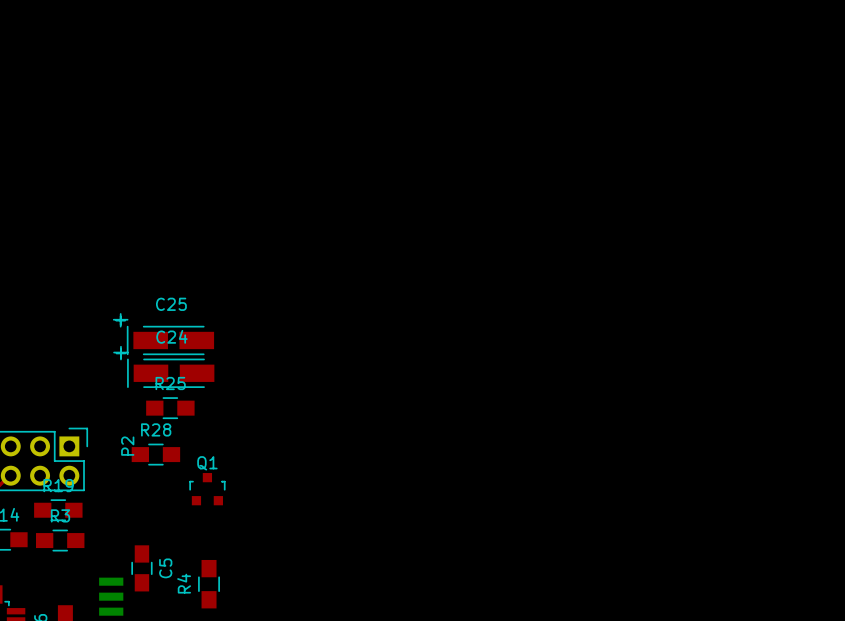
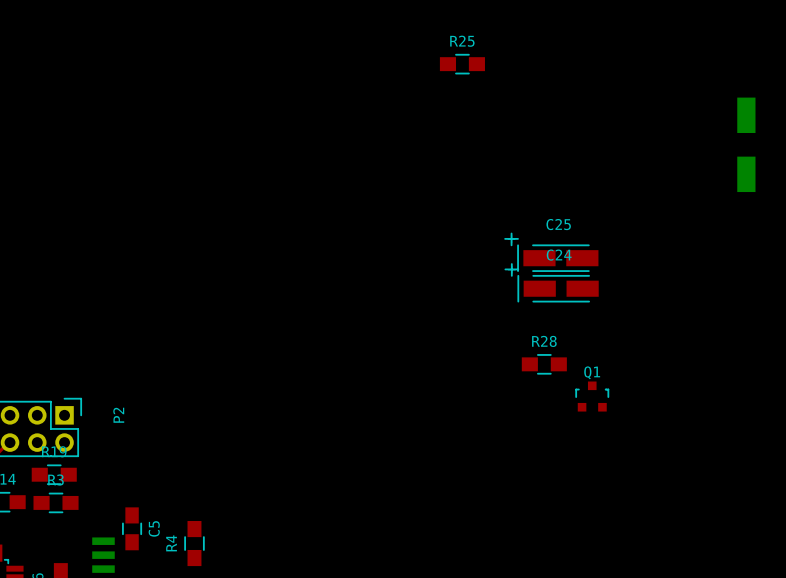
part: none -> (746, 144)
C25 position: (163, 334) -> (551, 252)
C24 position: (163, 366) -> (551, 282)
R25 position: (170, 408) -> (462, 64)
R28 position: (155, 454) -> (544, 364)
Q1 position: (207, 489) -> (592, 396)

